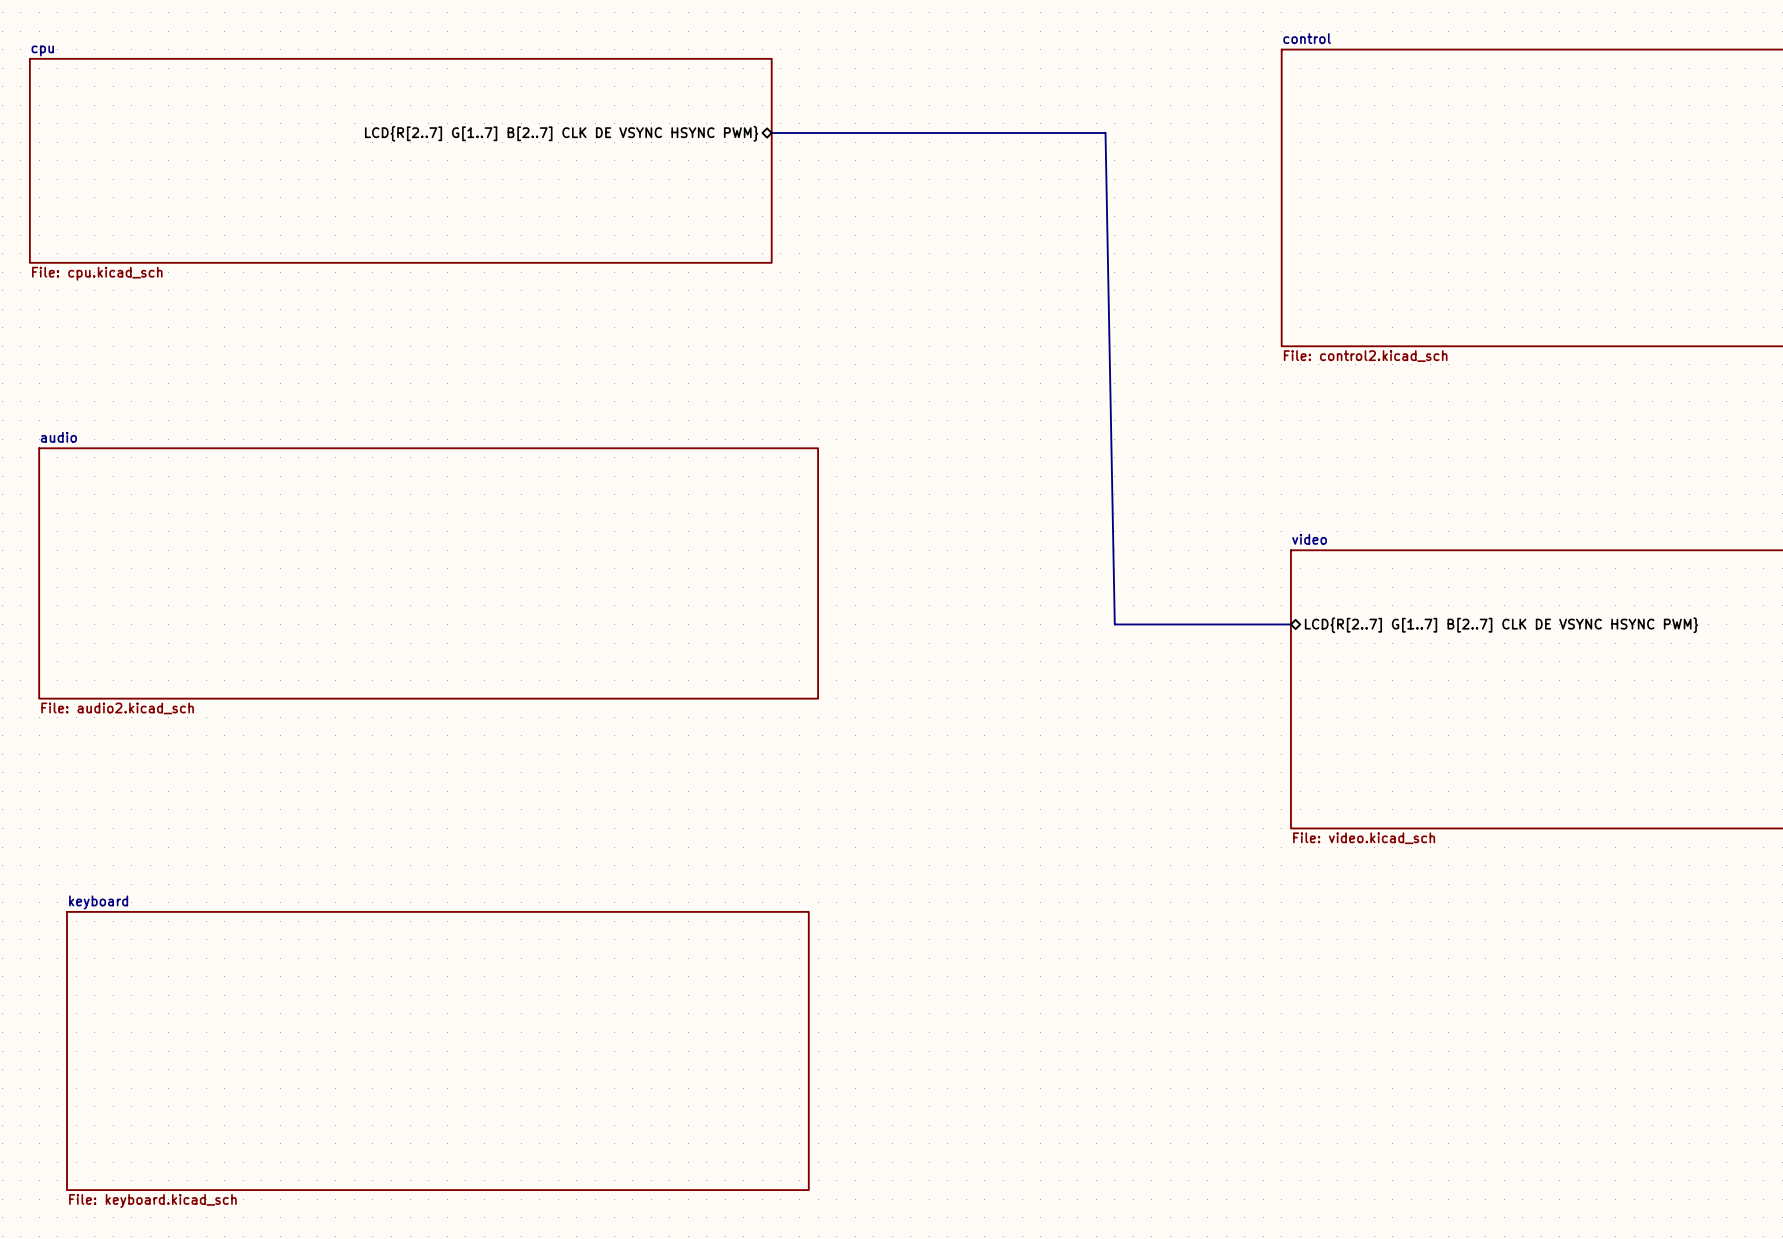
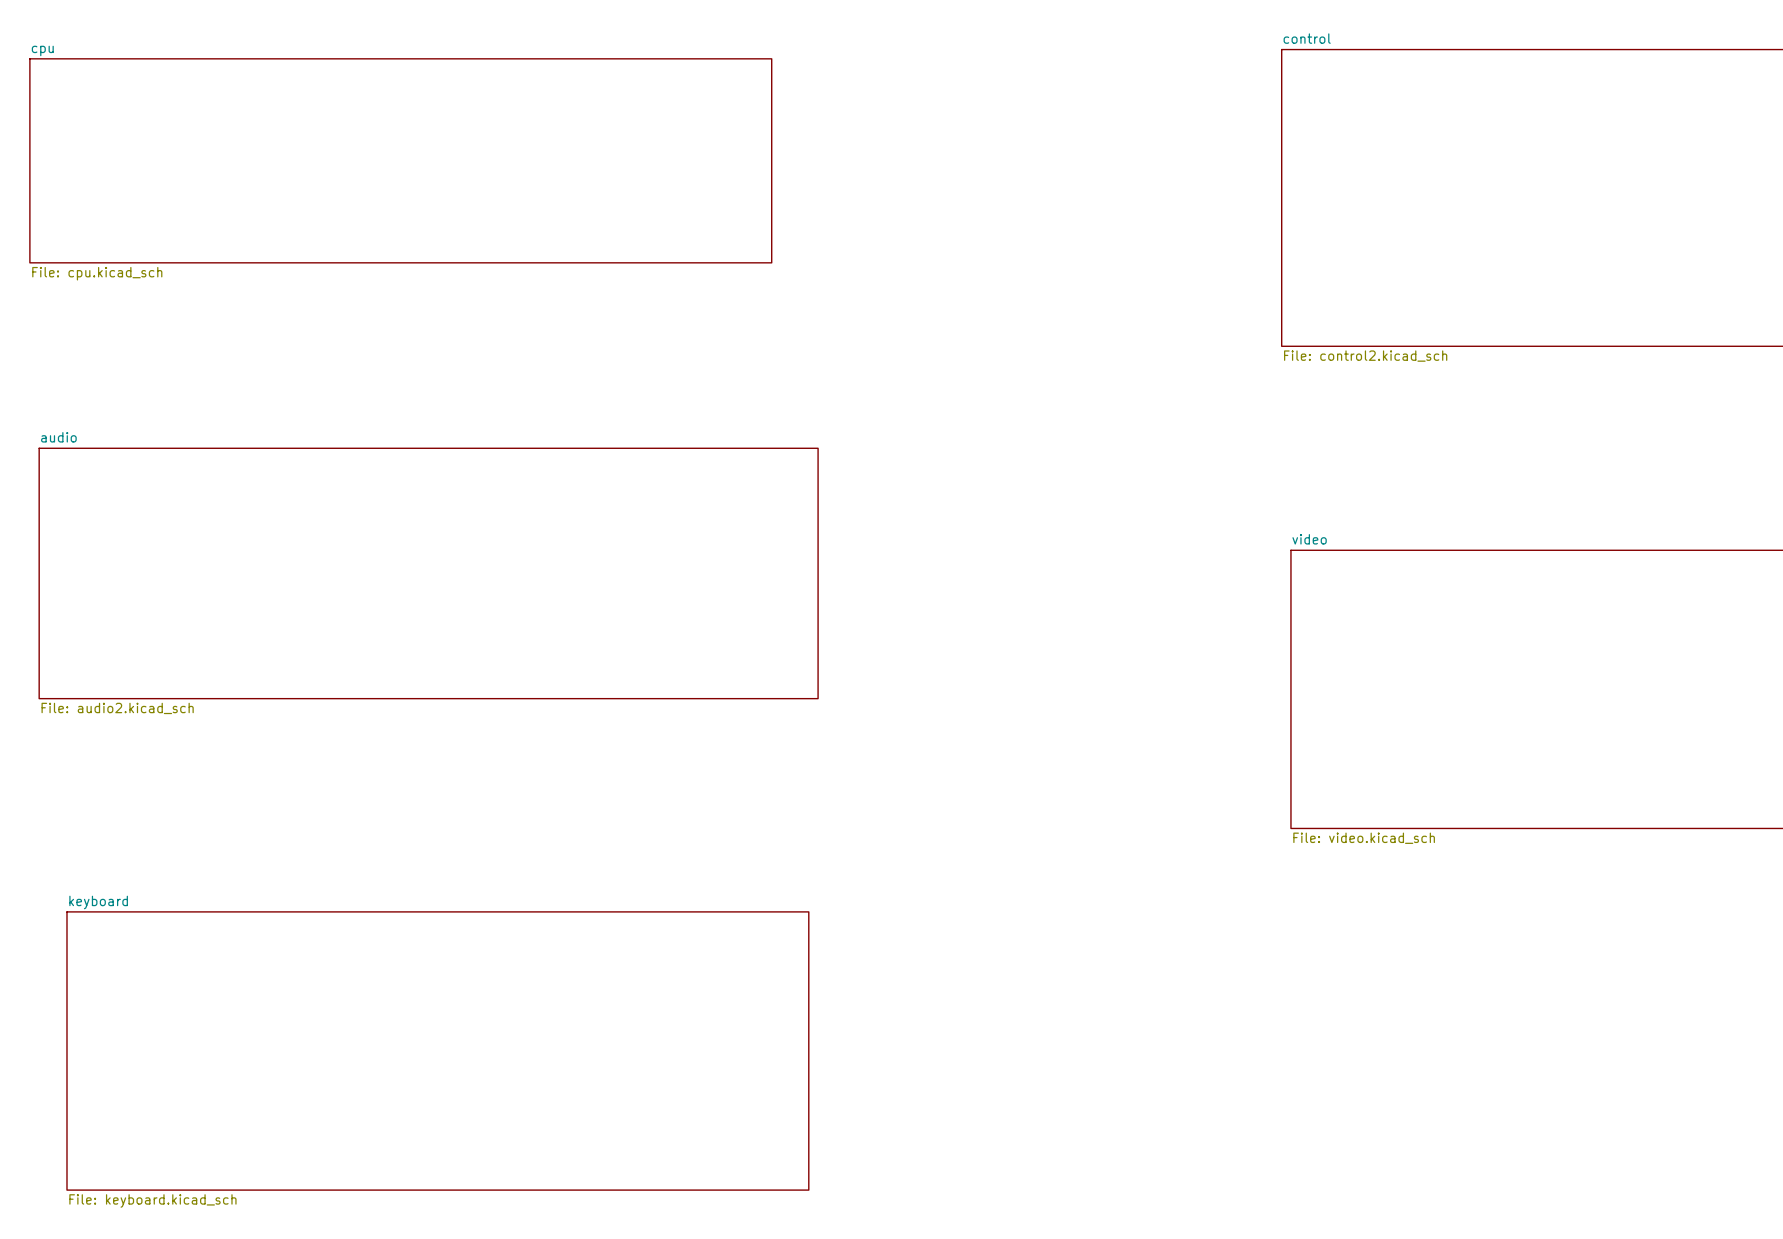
sheet pin: LCD{R[2..7] G[1..7] B[2..7] CLK DE VSYNC HSYNC PWM} (561, 133) -> none
bus: (771, 133) (1105, 133) (1114, 624) (1290, 624) -> none
sheet pin: LCD{R[2..7] G[1..7] B[2..7] CLK DE VSYNC HSYNC PWM} (1501, 625) -> none

